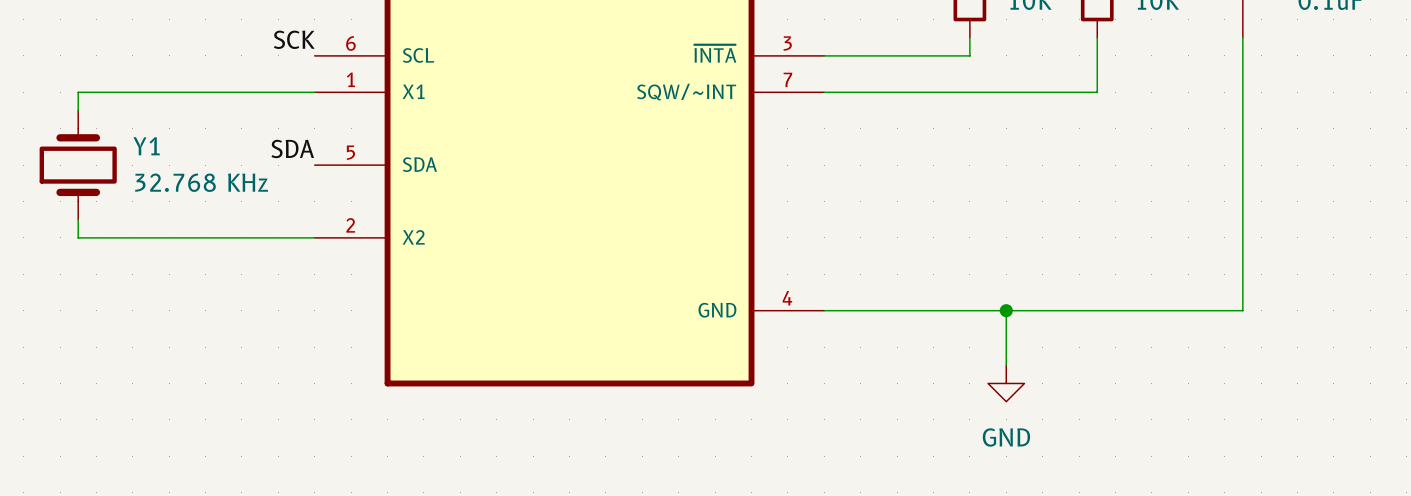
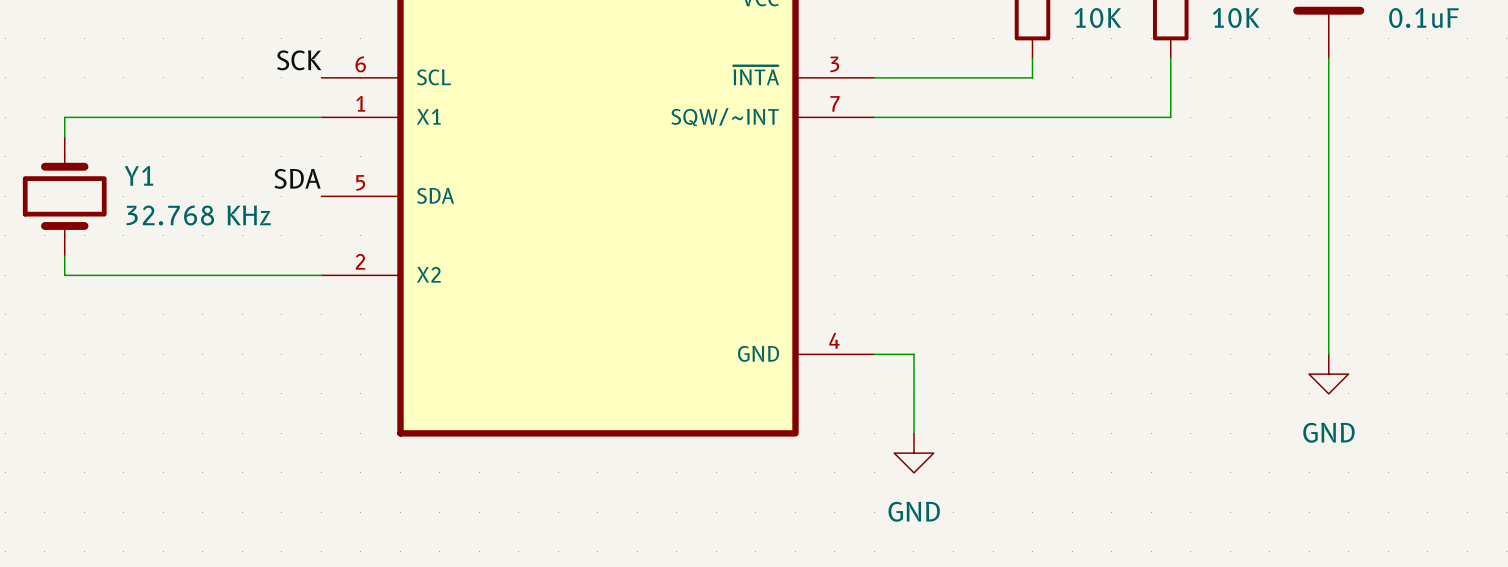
wire: (860, 310) (1242, 310) -> (913, 354) (913, 433)
wire: (1006, 310) (1006, 365) -> none
junction: (1006, 310) -> none
power symbol: none -> GND (1328, 374)
power symbol: GND (1006, 383) -> none
power symbol: none -> GND (913, 453)

